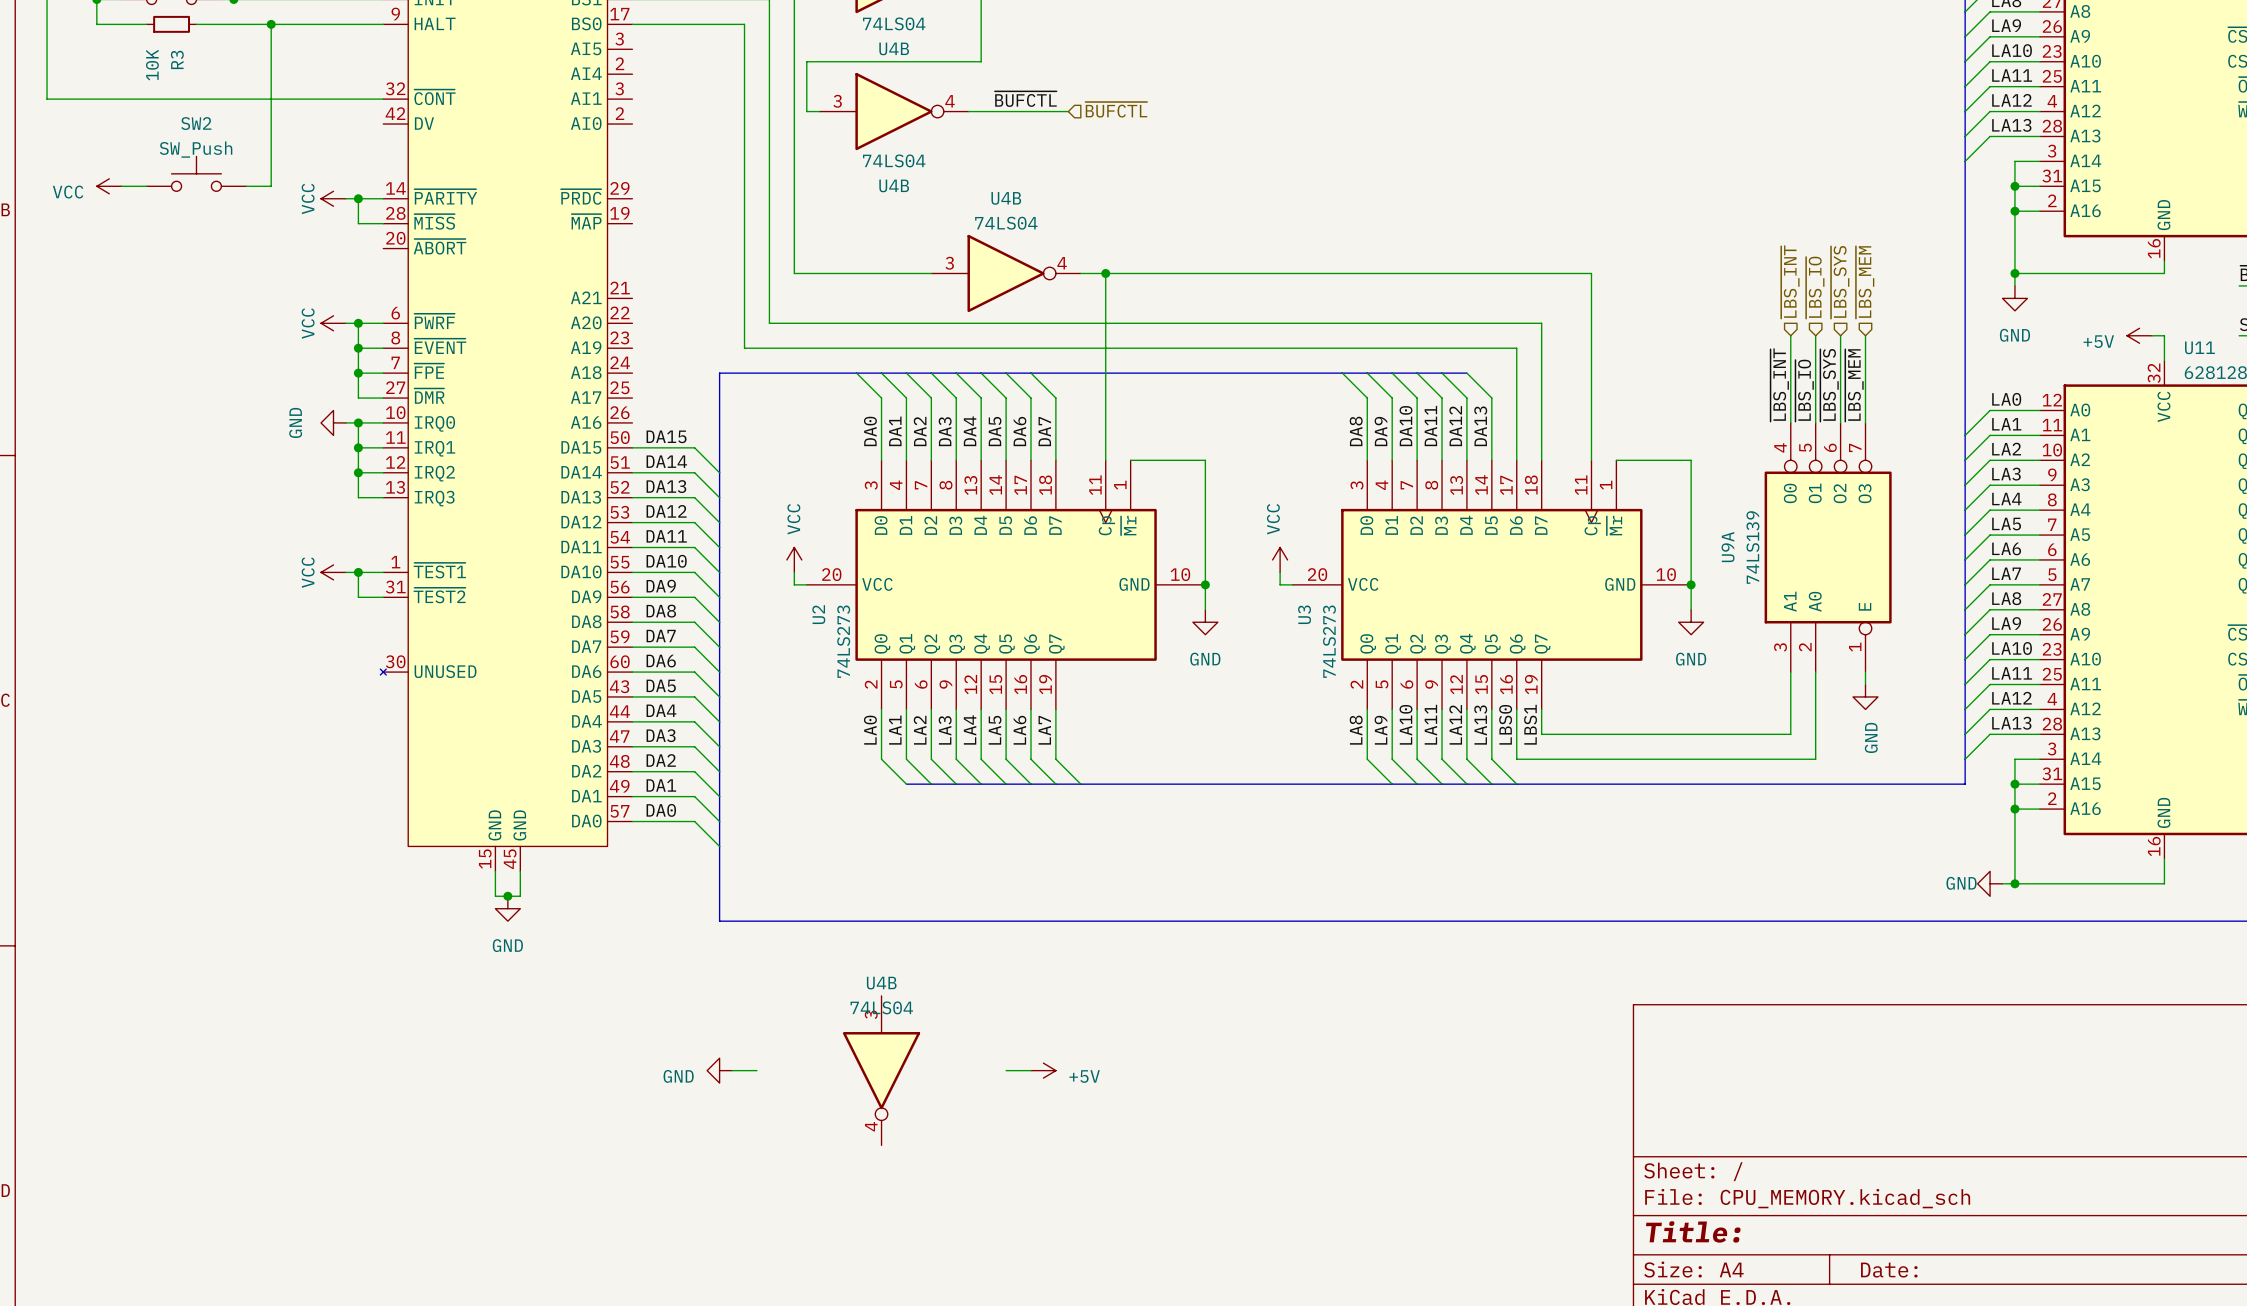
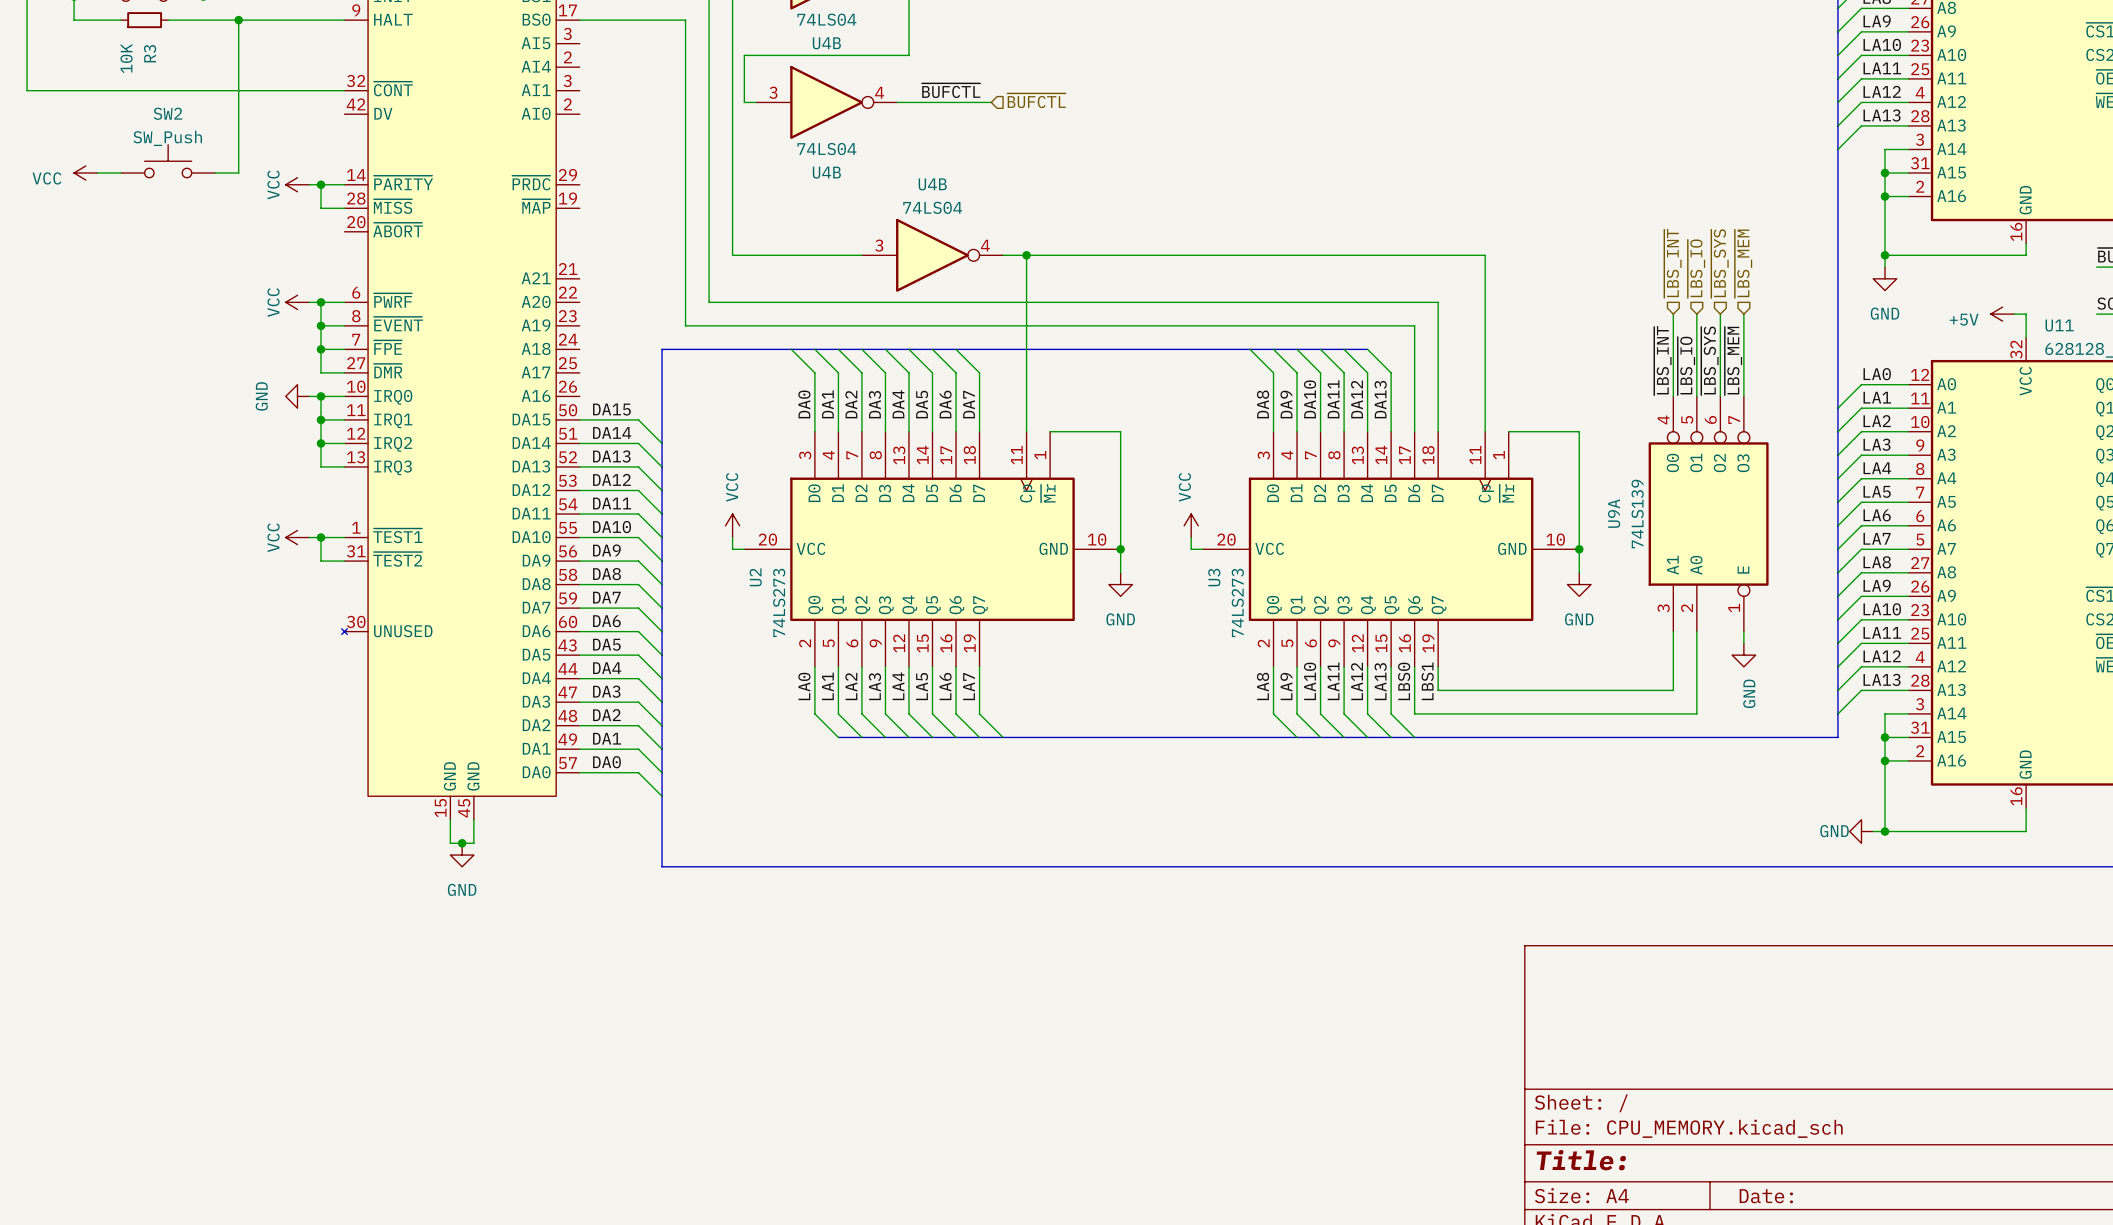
power symbol: GND (719, 1070) -> none
wire: (732, 1070) (756, 1070) -> none
U4B: 74LS04 (881, 1070) -> none
wire: (1006, 1070) (1030, 1070) -> none
power symbol: +5V (1043, 1070) -> none

